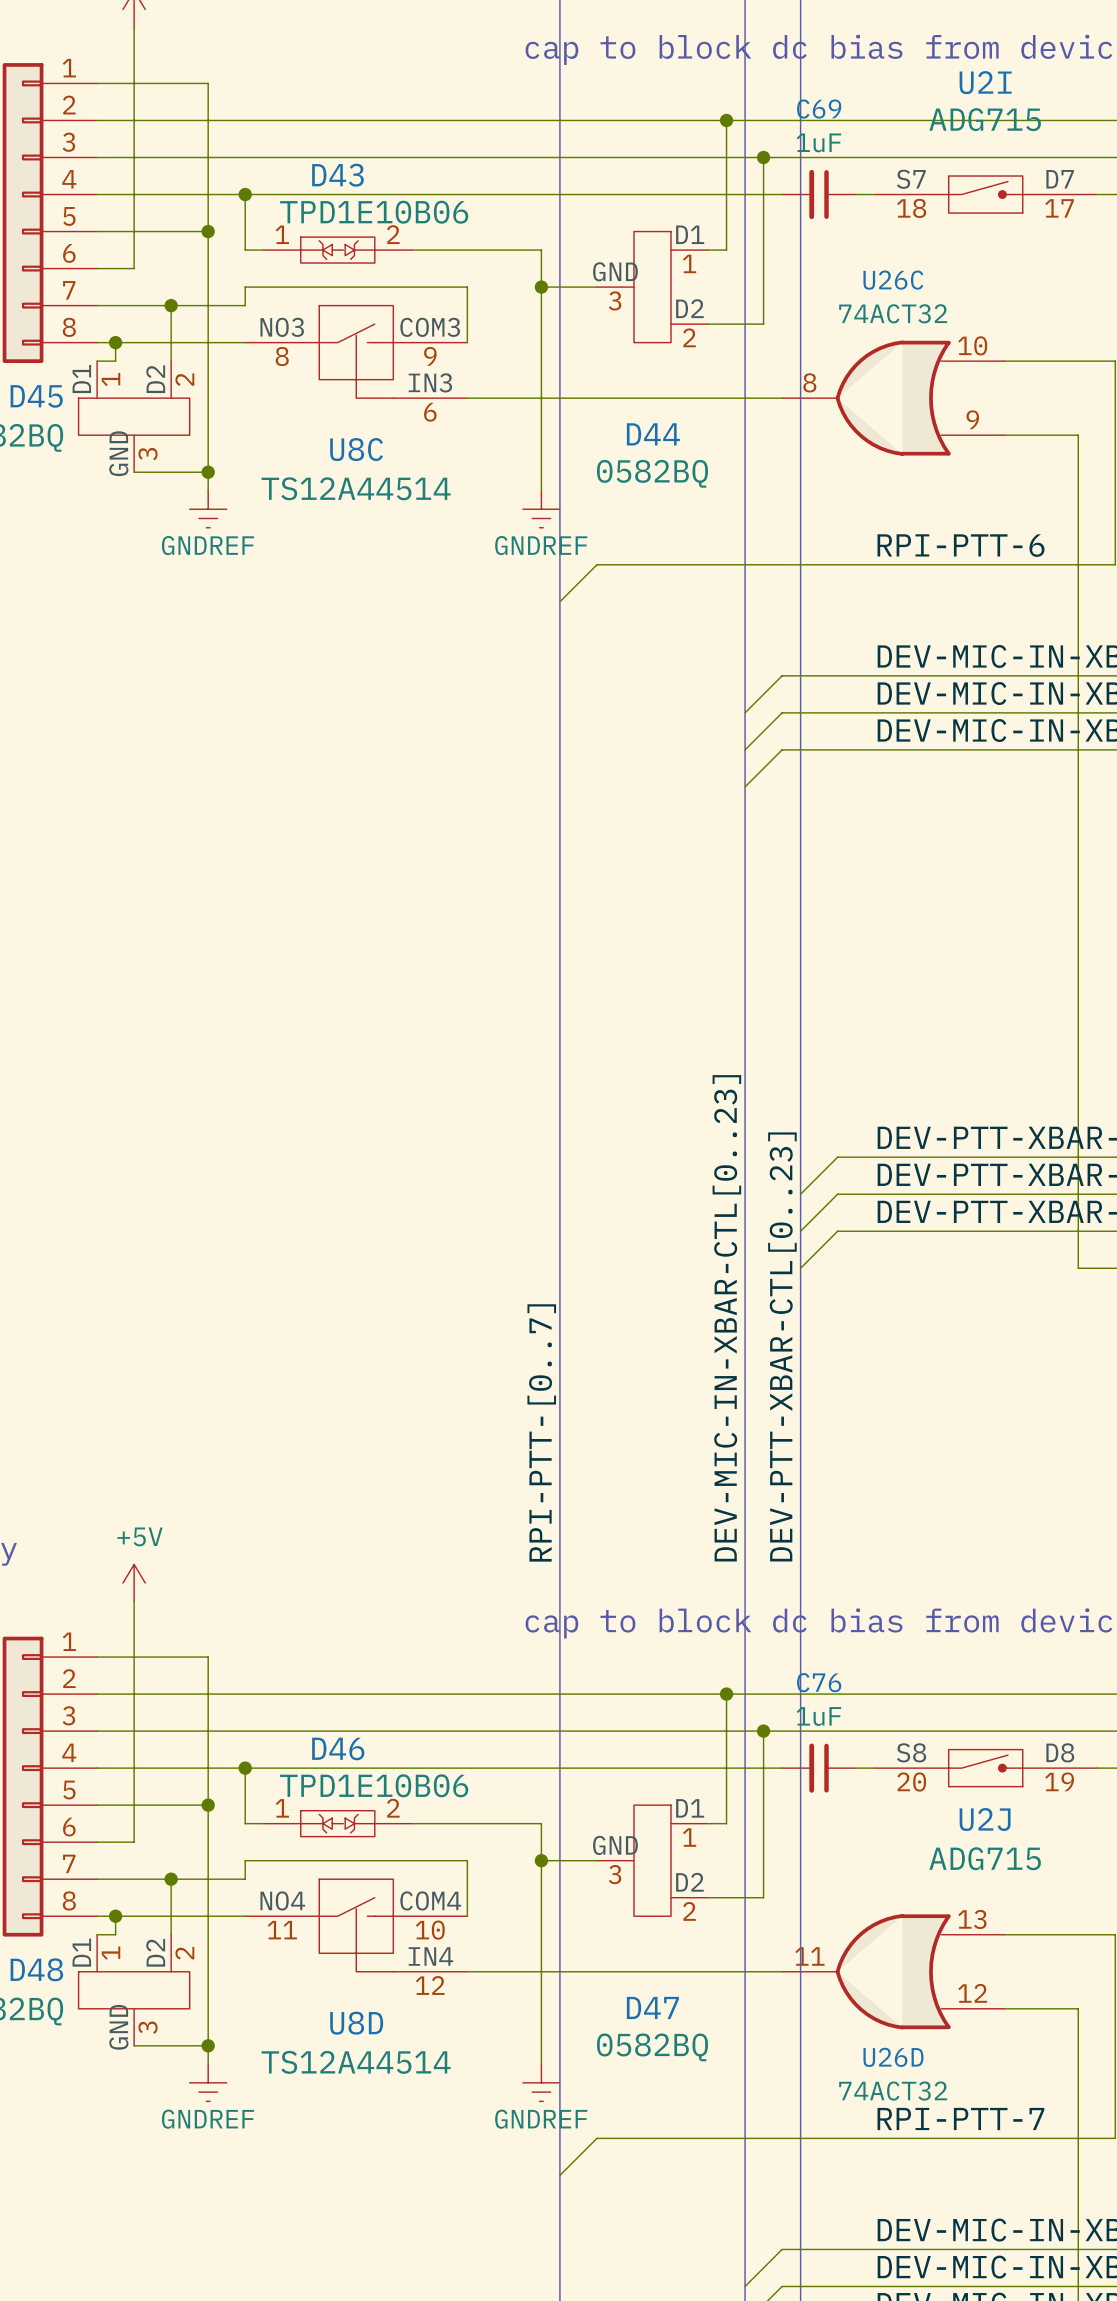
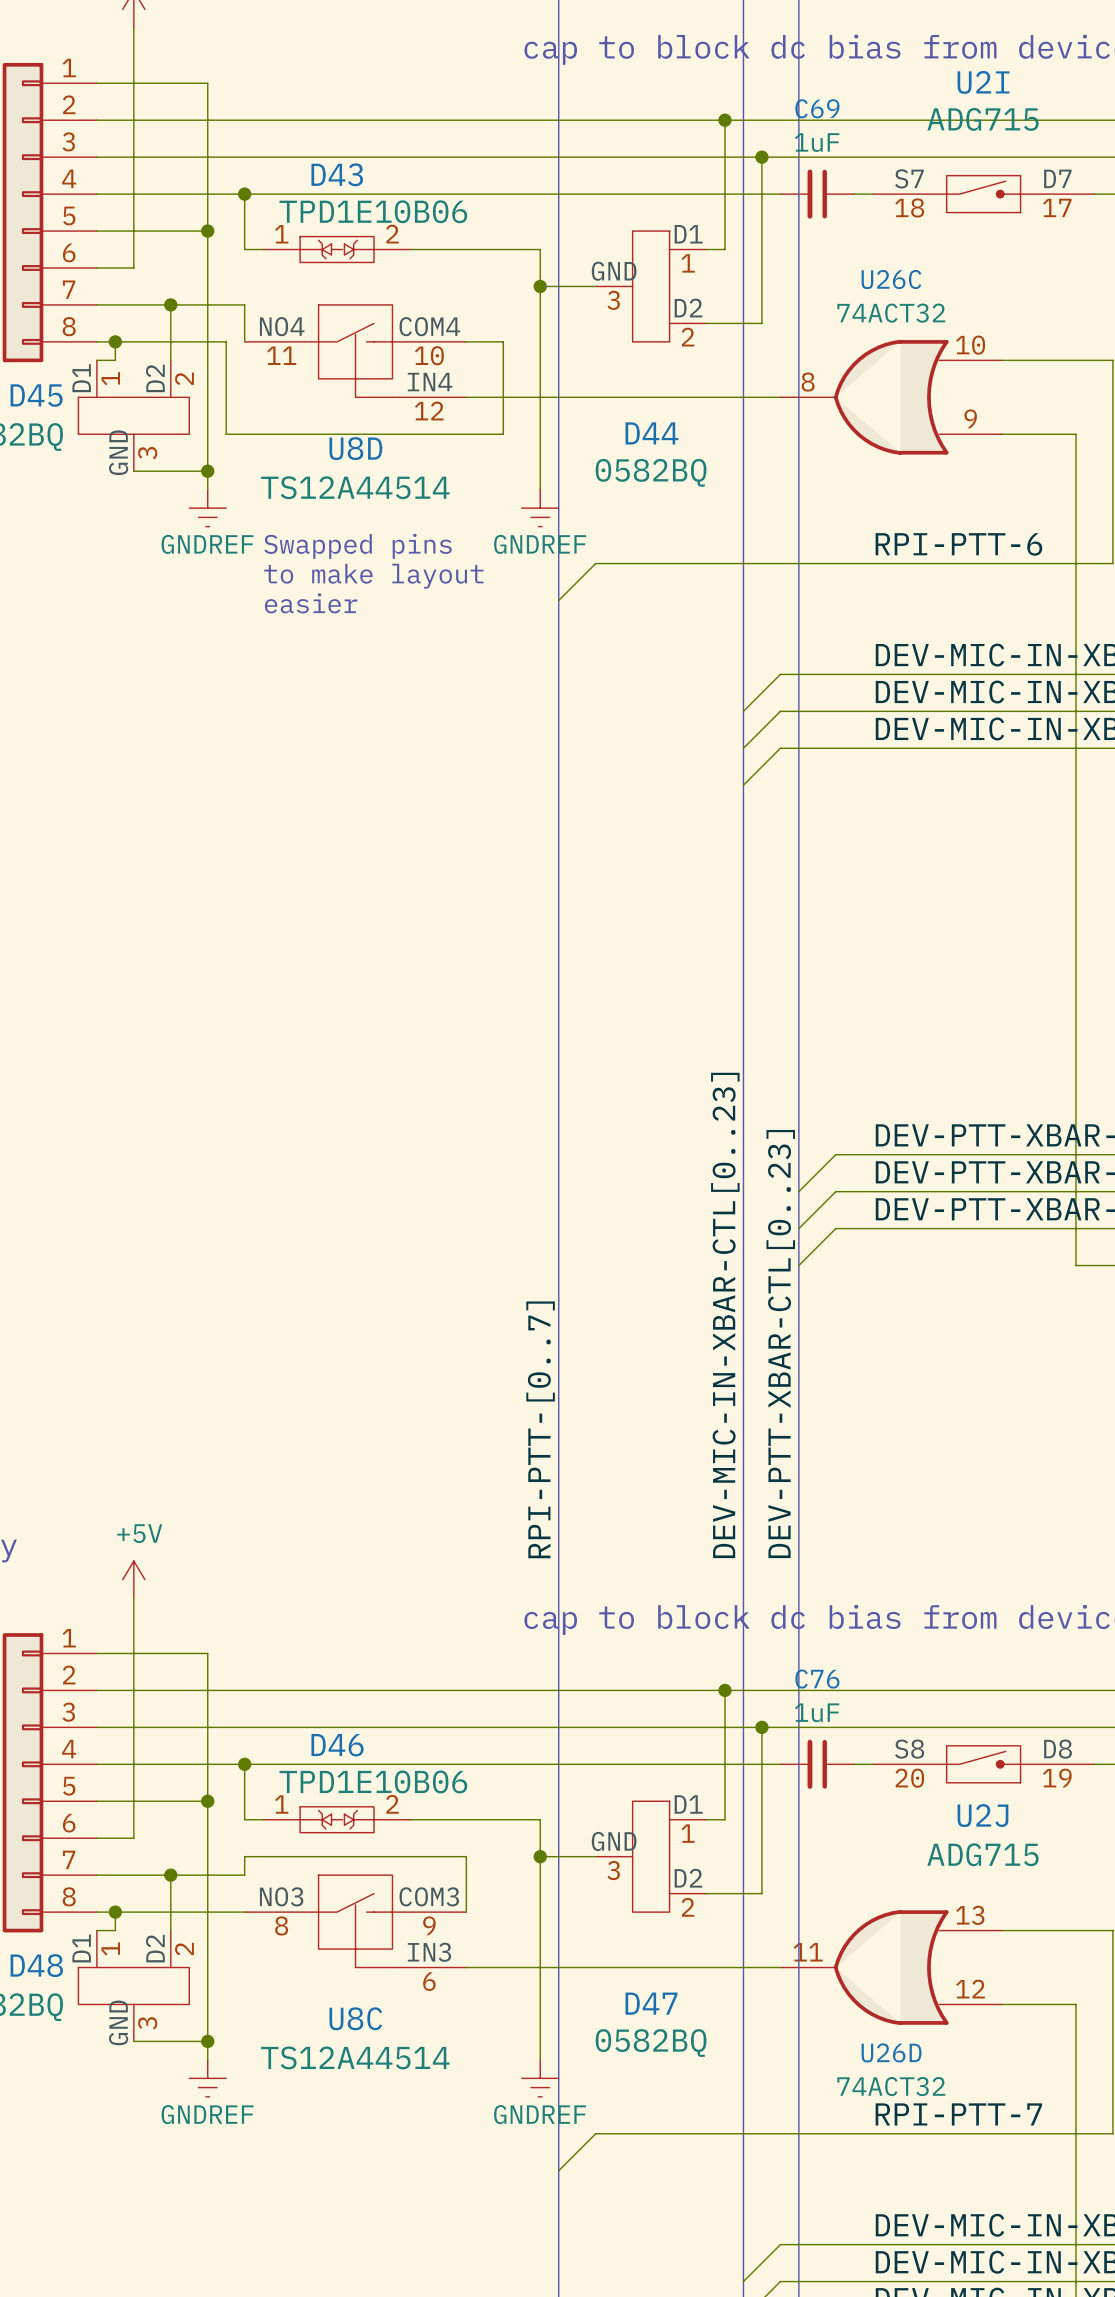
wire: (245, 305) (245, 287) (467, 287) (467, 342) -> (226, 341) (226, 434) (503, 434) (503, 341) (466, 341)
wire: (226, 342) (245, 342) -> (244, 304) (244, 341)
U8C position: (356, 351) -> (355, 1921)
text: none -> Swapped pins (358, 546)
text: none -> to make layout (373, 576)
text: none -> easier (311, 603)
U8D position: (356, 1925) -> (355, 351)

